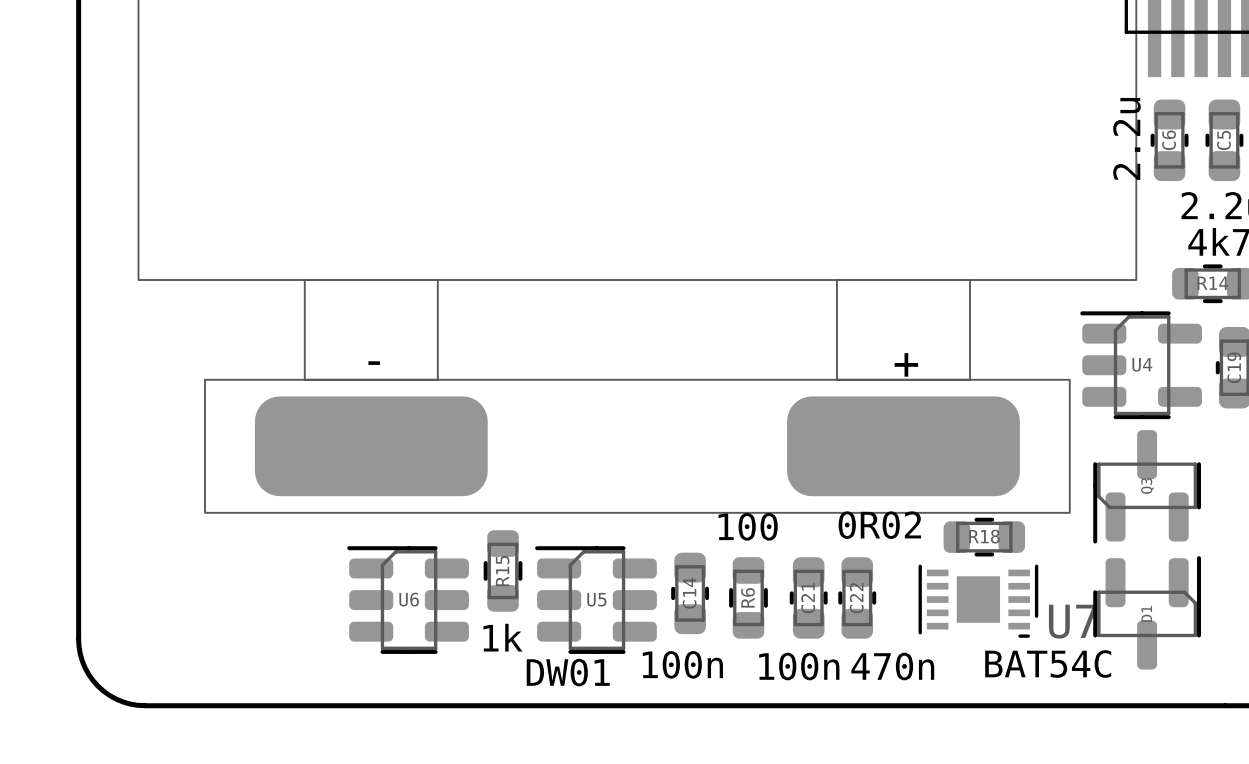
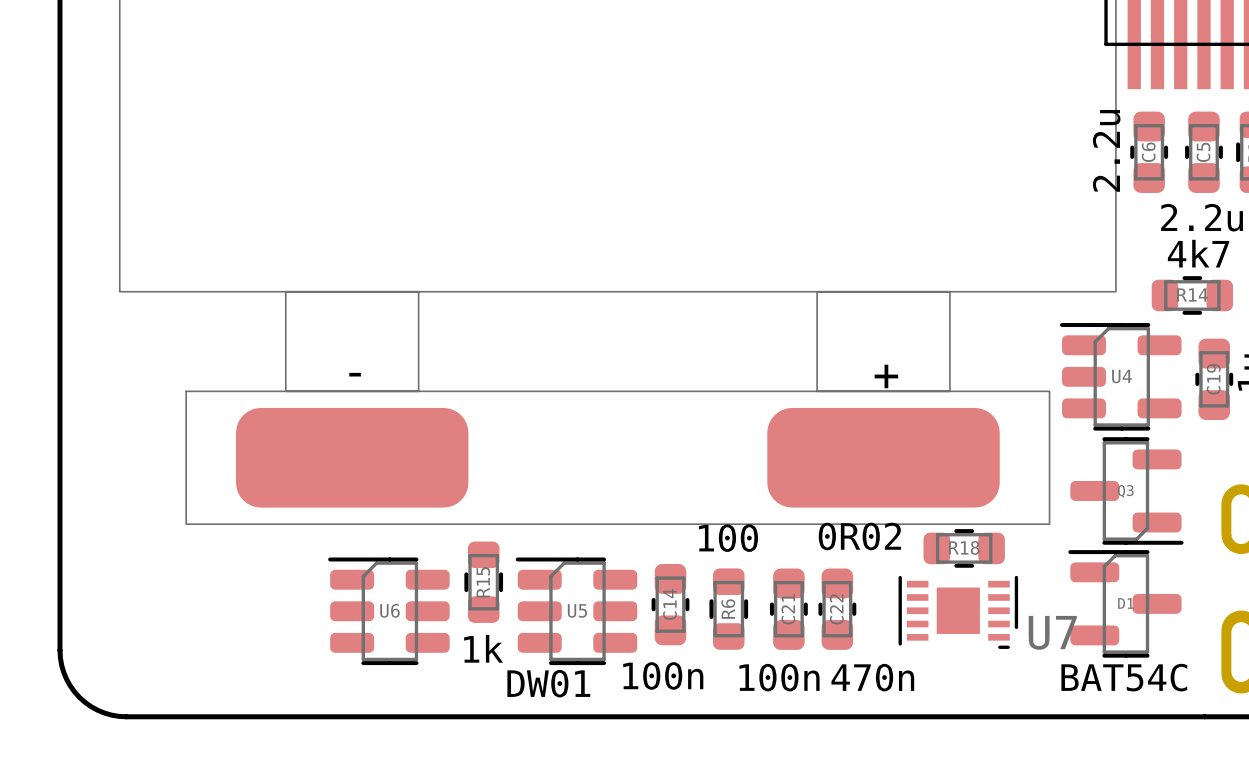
Q3 rotation: 0° (1147, 486) -> 90° counterclockwise (1126, 490)
D1 rotation: 0° (1147, 612) -> 90° counterclockwise (1124, 603)

